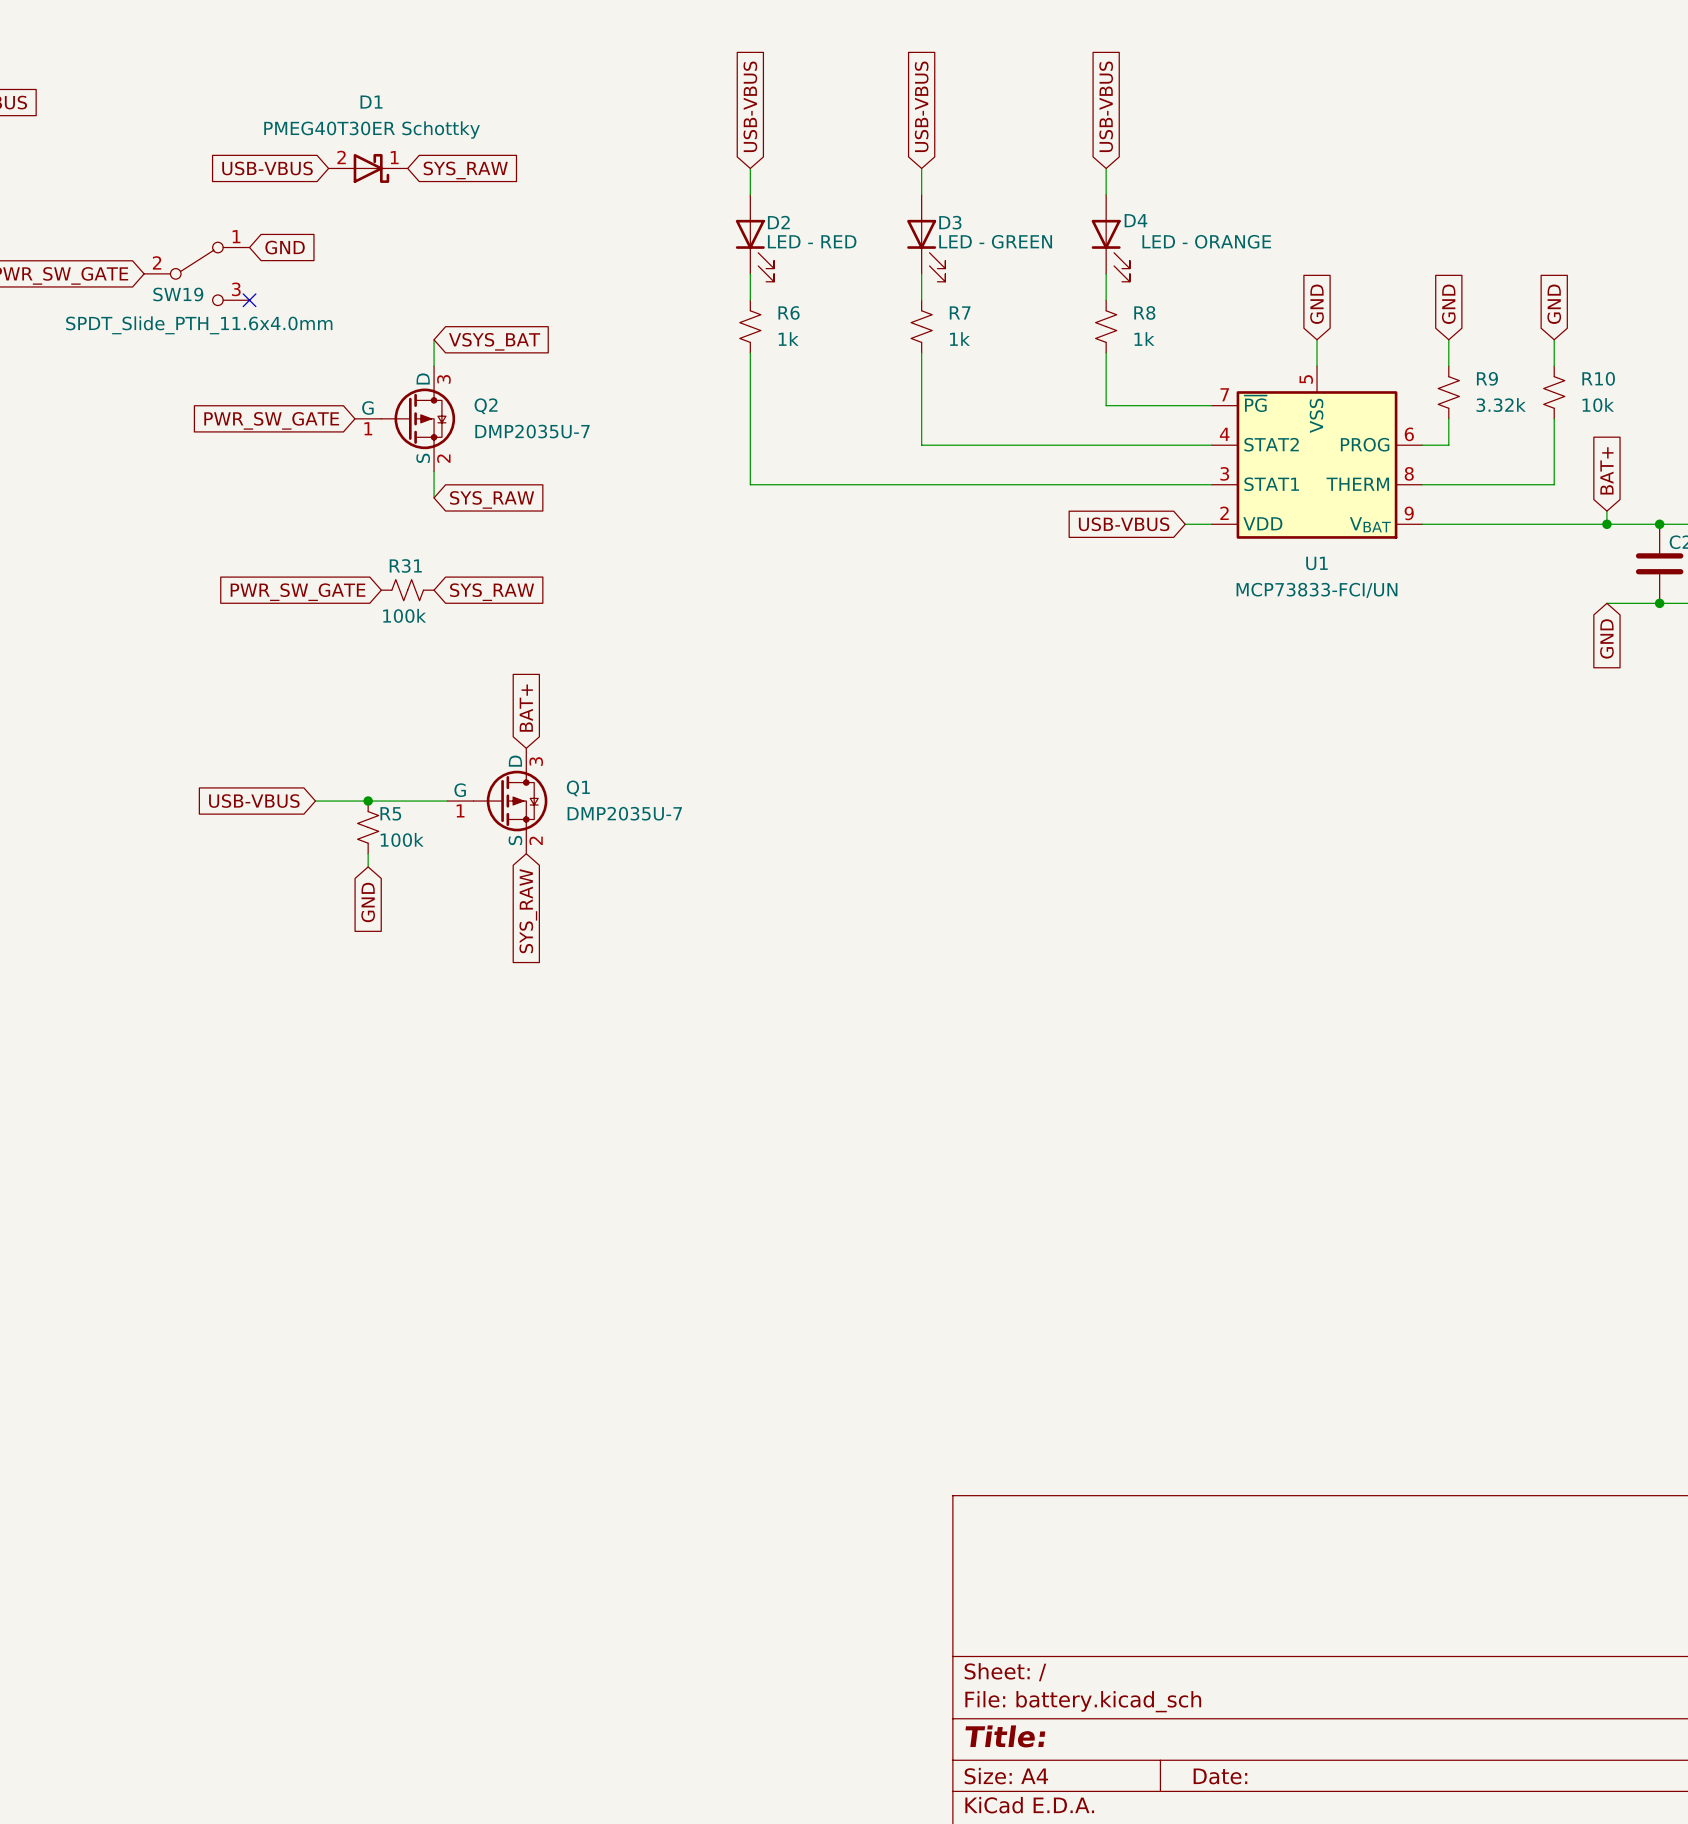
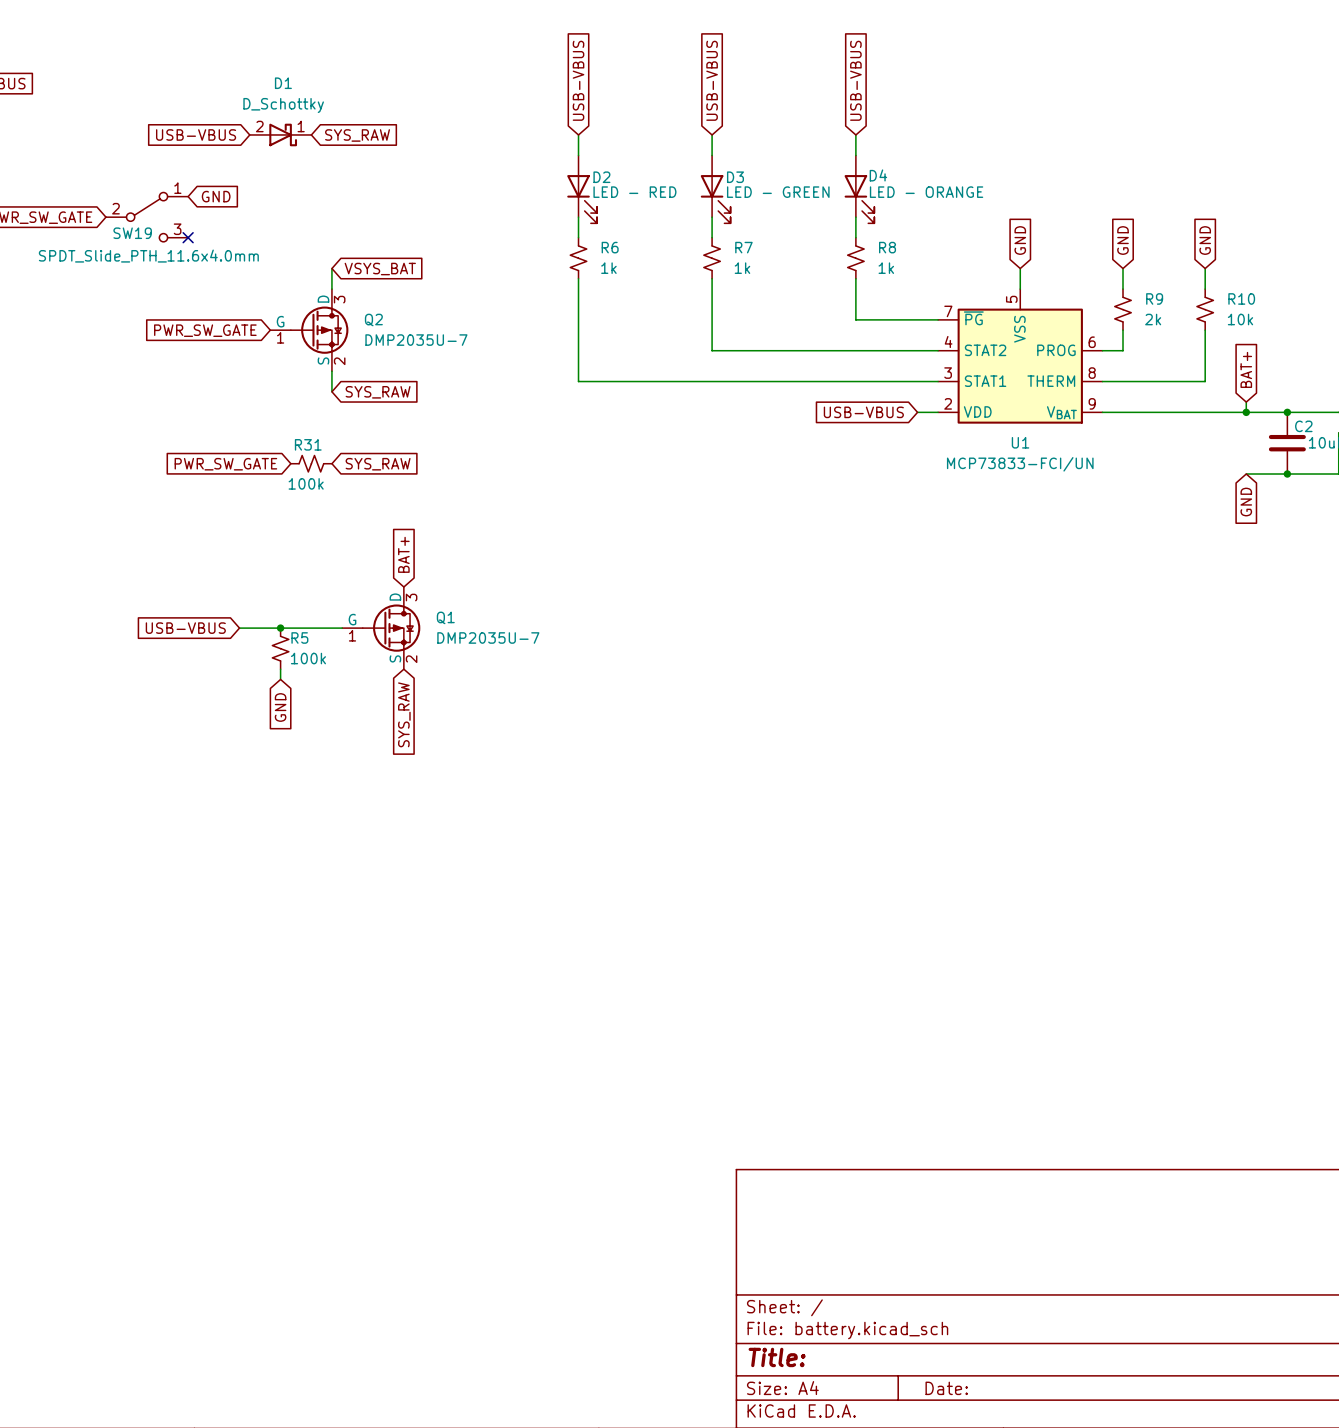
D1 value: PMEG40T30ER Schottky (372, 130) -> D_Schottky (283, 105)
R9 value: 3.32k (1501, 405) -> 2k (1153, 319)

